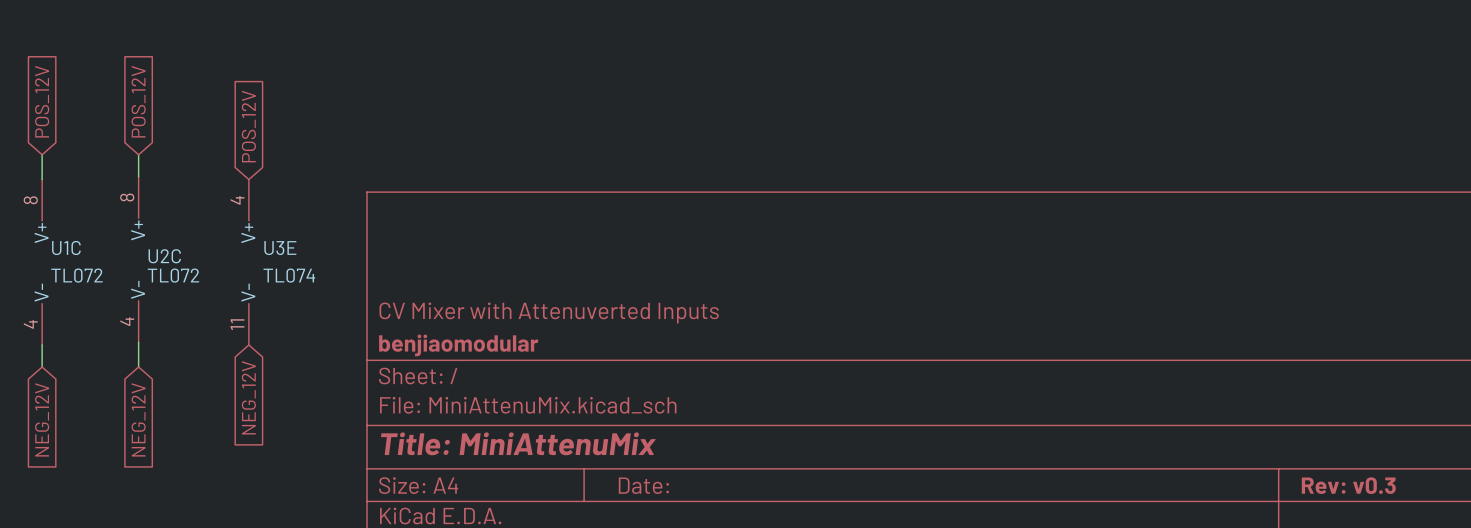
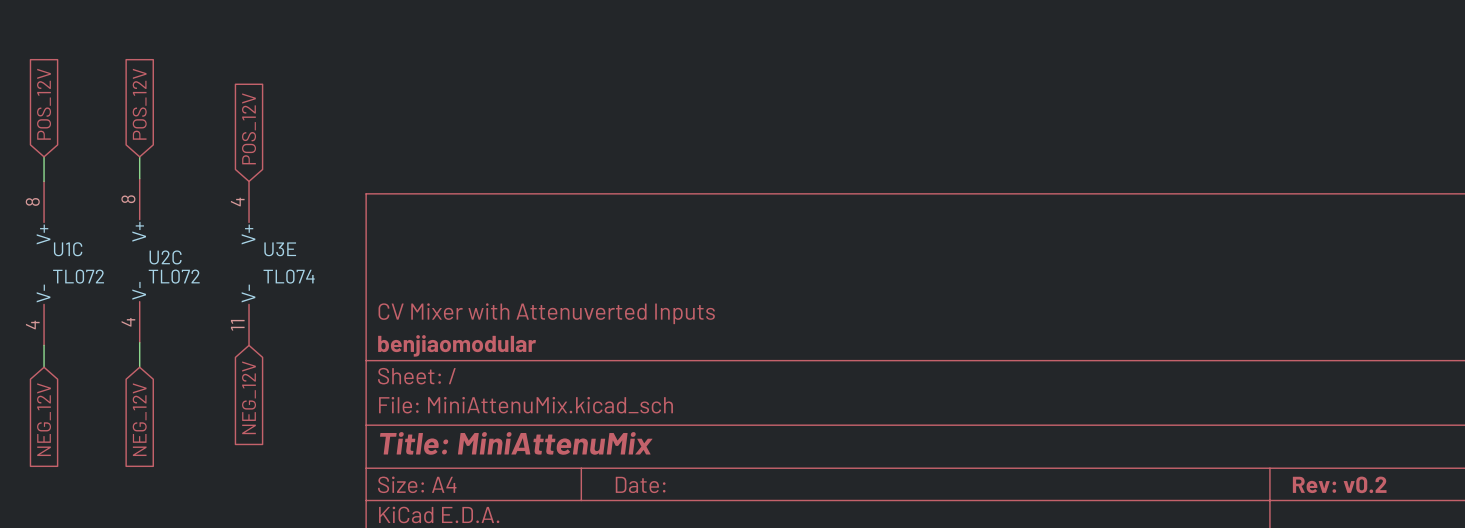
title block: Rev: v0.3 (1348, 485) -> Rev: v0.2 (1339, 484)

